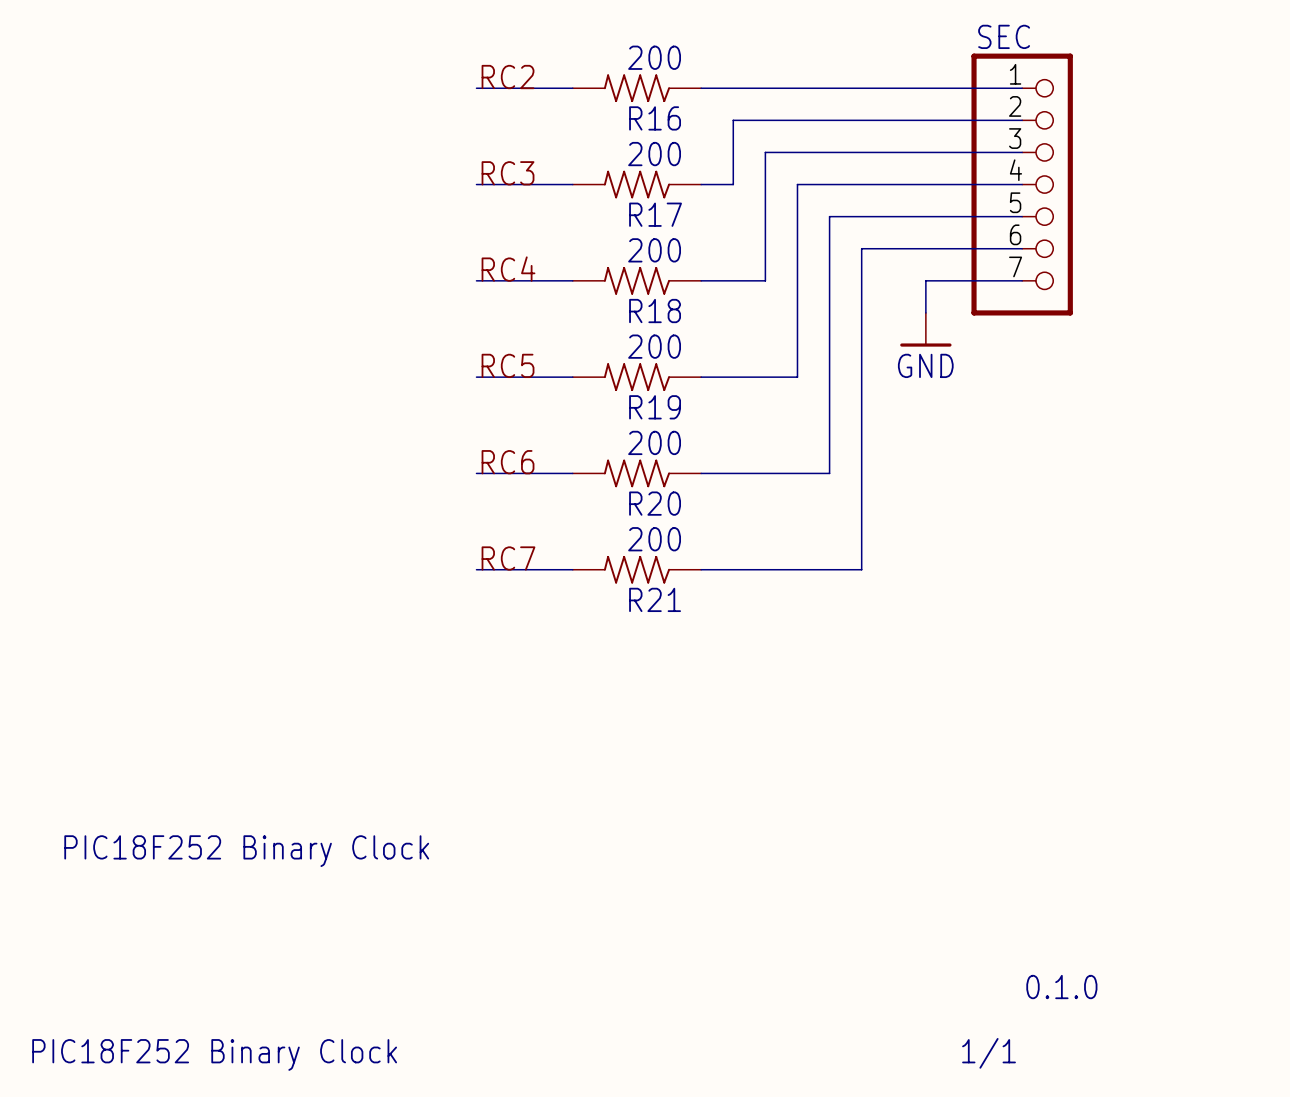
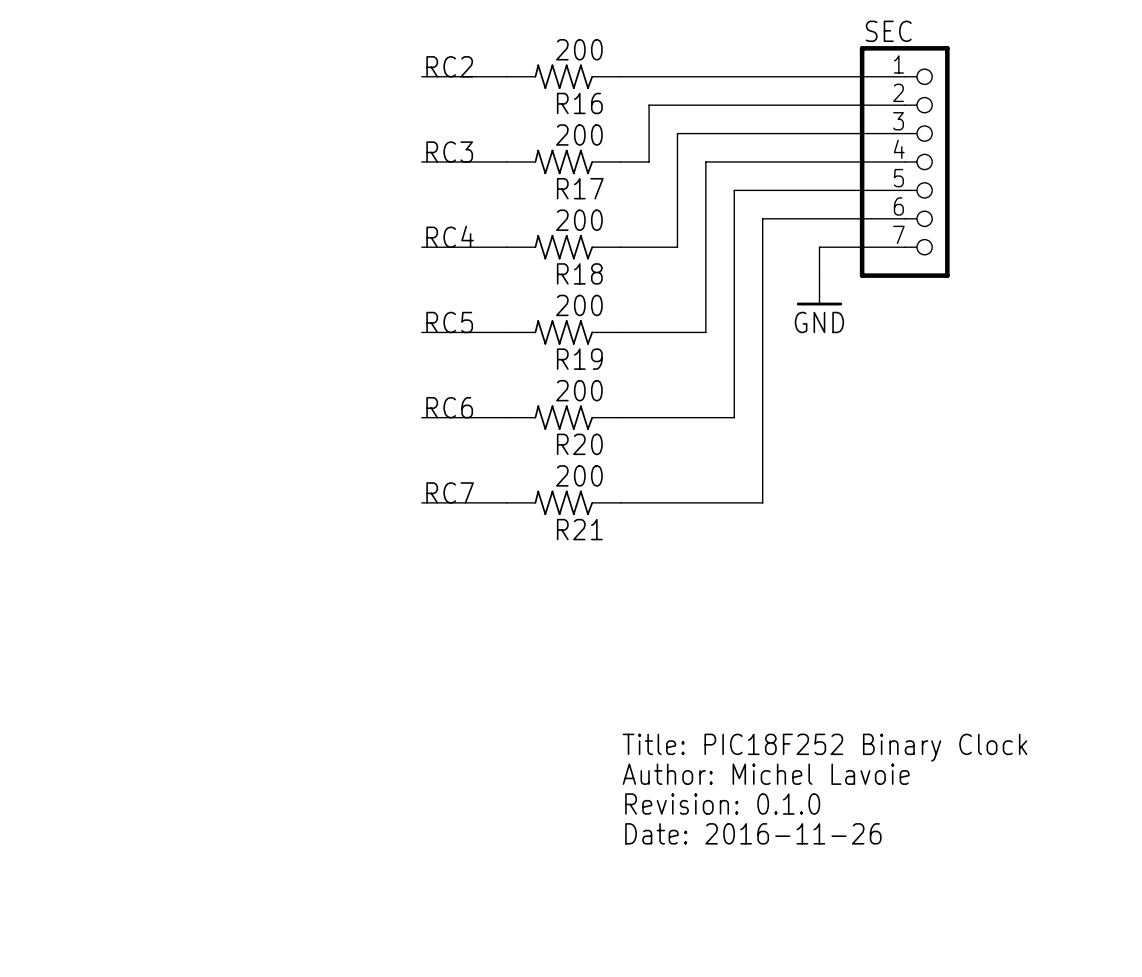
text: none -> Title: PIC18F252 Binary Clock (824, 747)
text: PIC18F252 Binary Clock (246, 851) -> none
text: none -> Author: Michel Lavoie (766, 774)
text: none -> Revision: 0.1.0 (722, 804)
text: none -> Date: 2016-11-26 (753, 833)
text: 0.1.0 (1061, 987) -> none
text: 1/1 (989, 1053) -> none
text: PIC18F252 Binary Clock (214, 1054) -> none

